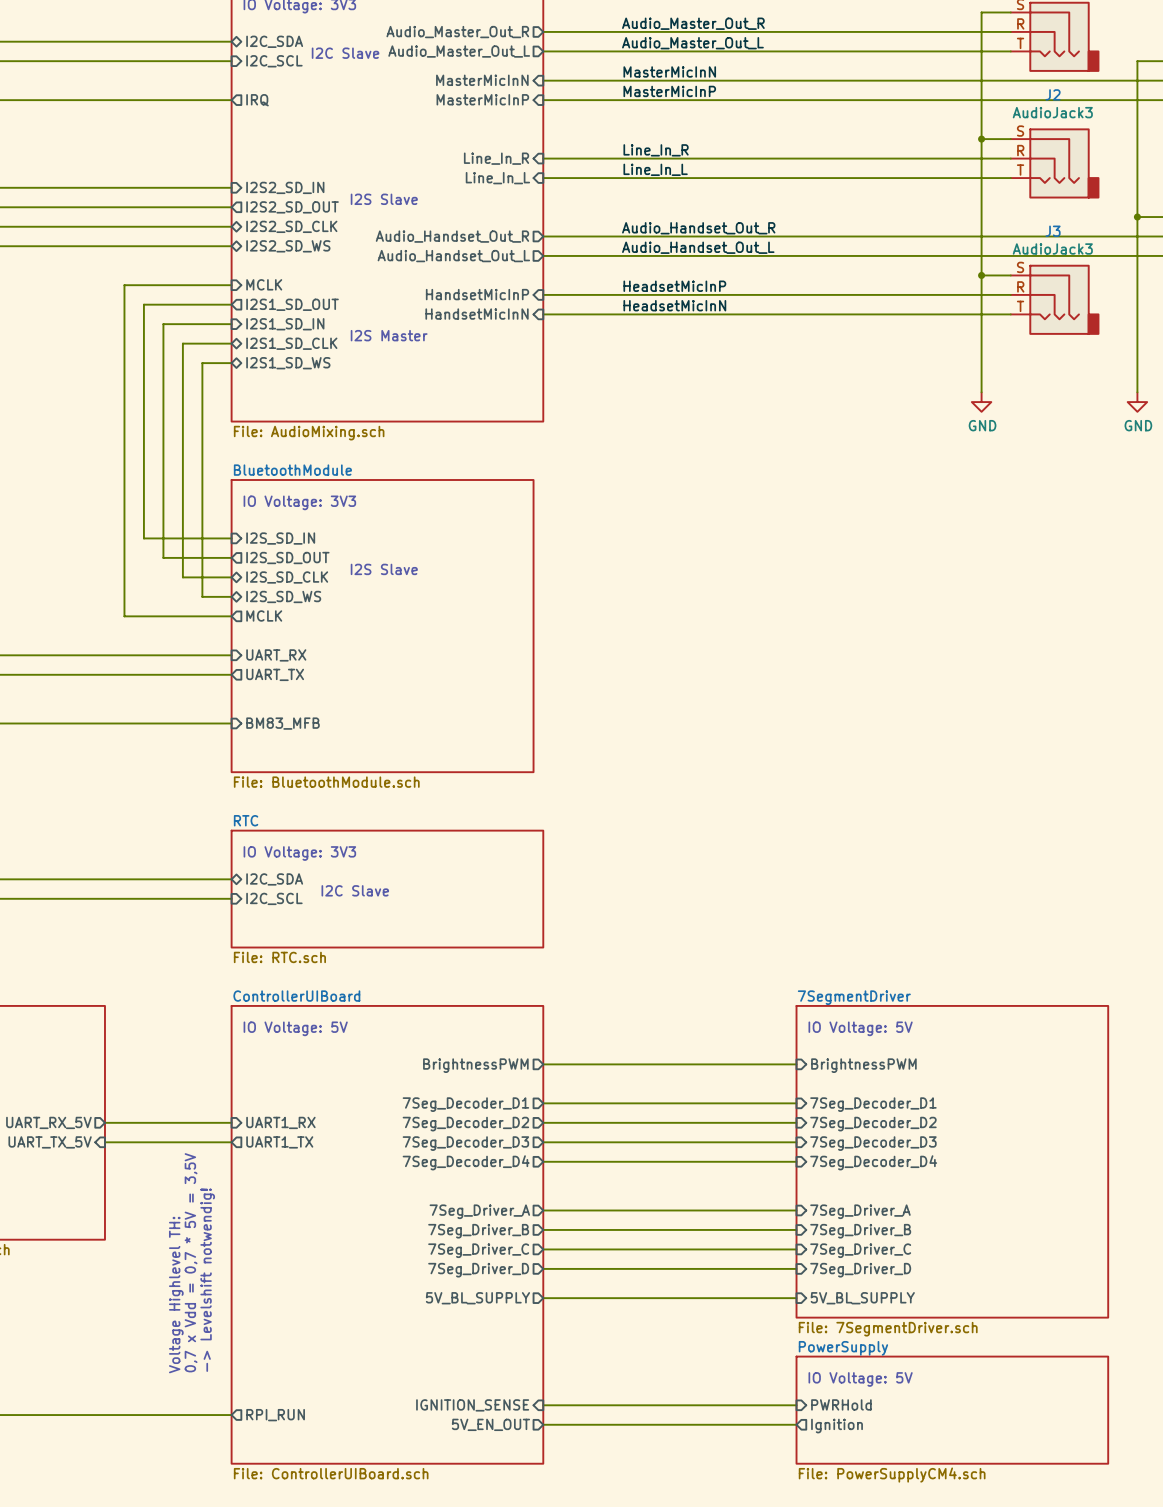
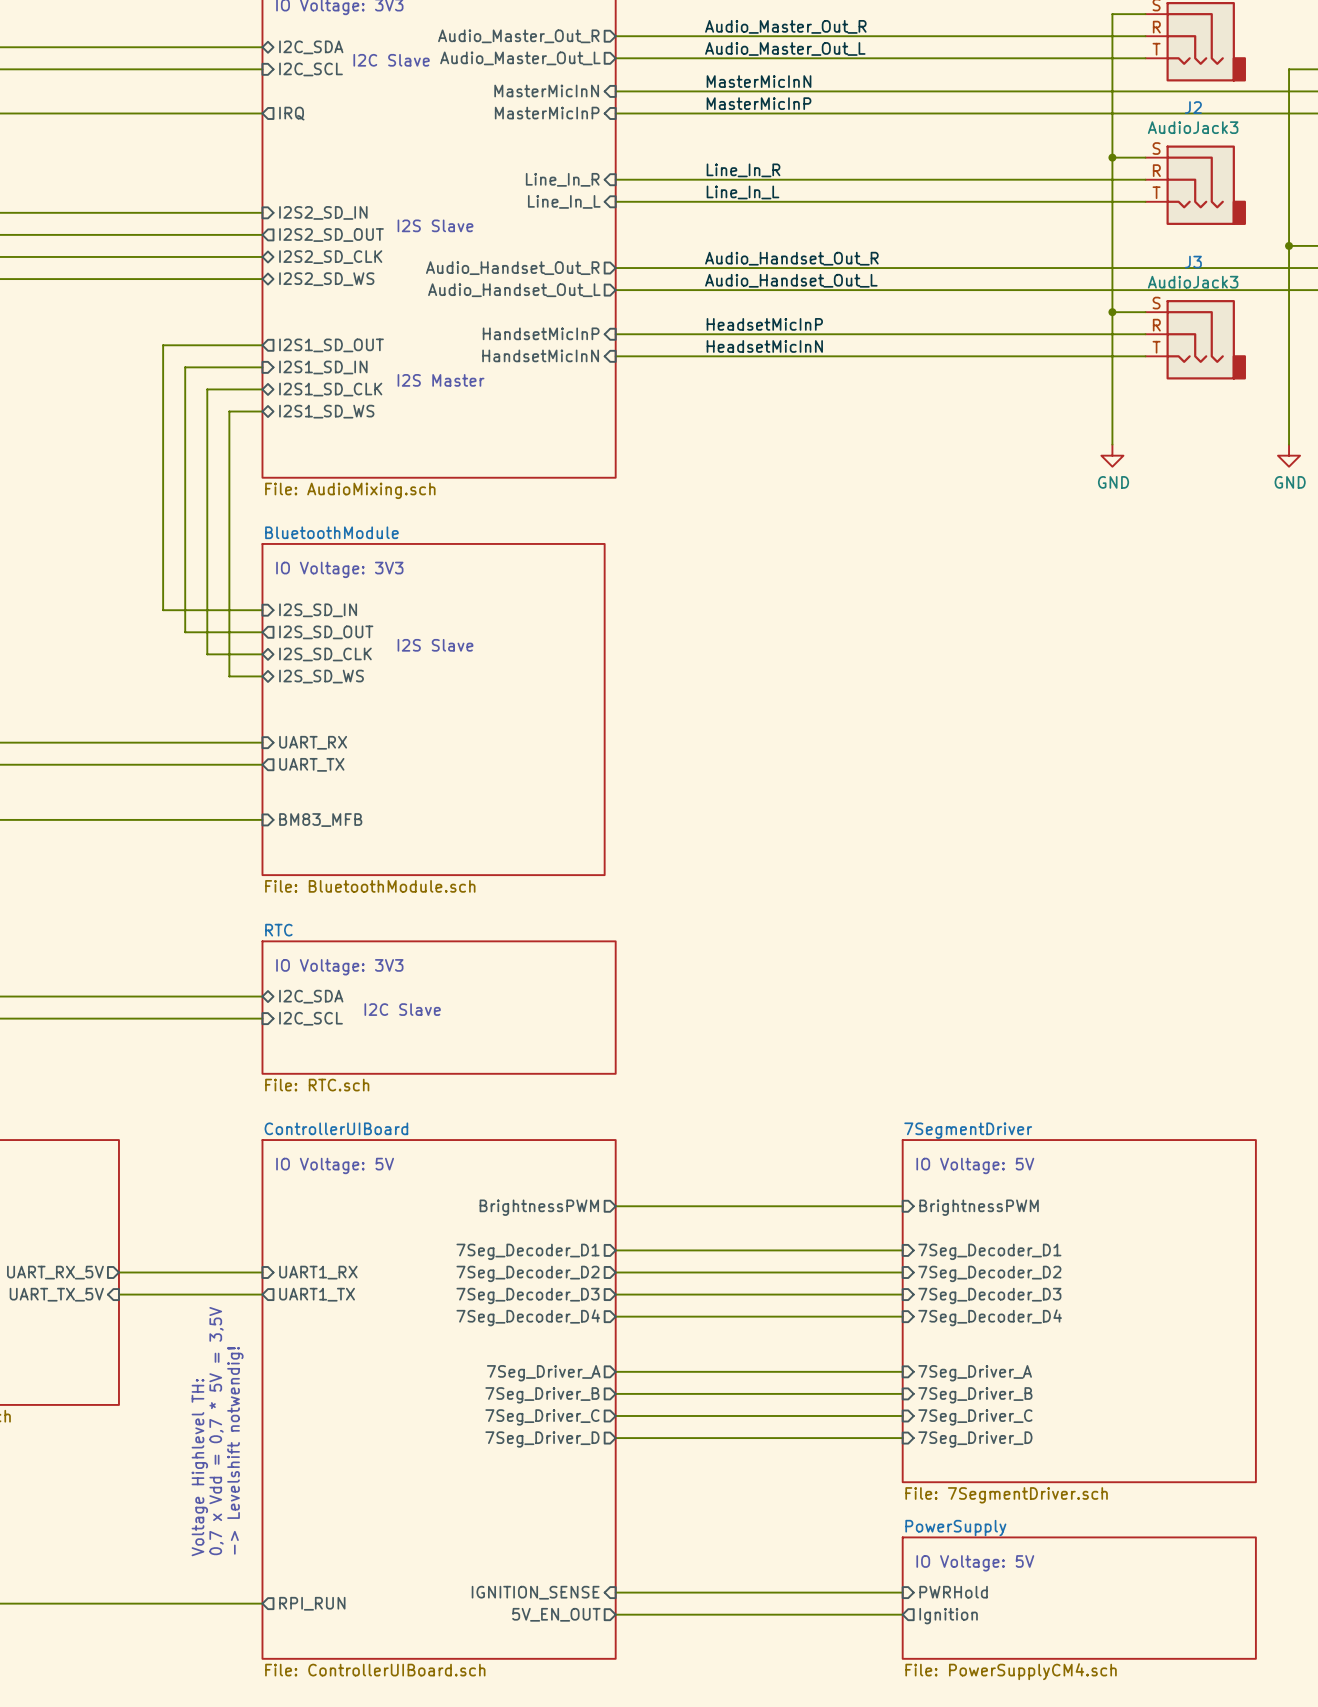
sheet pin: MCLK (264, 284) -> none
wire: (231, 285) (124, 285) (124, 616) (231, 616) -> none
sheet pin: MCLK (264, 615) -> none
sheet 7SegmentDriver shape: [796, 1005, 1109, 1318] -> [902, 1140, 1256, 1483]
sheet pin: 5V_BL_SUPPLY (477, 1298) -> none
wire: (543, 1298) (796, 1298) -> none
sheet pin: 5V_BL_SUPPLY (862, 1298) -> none

